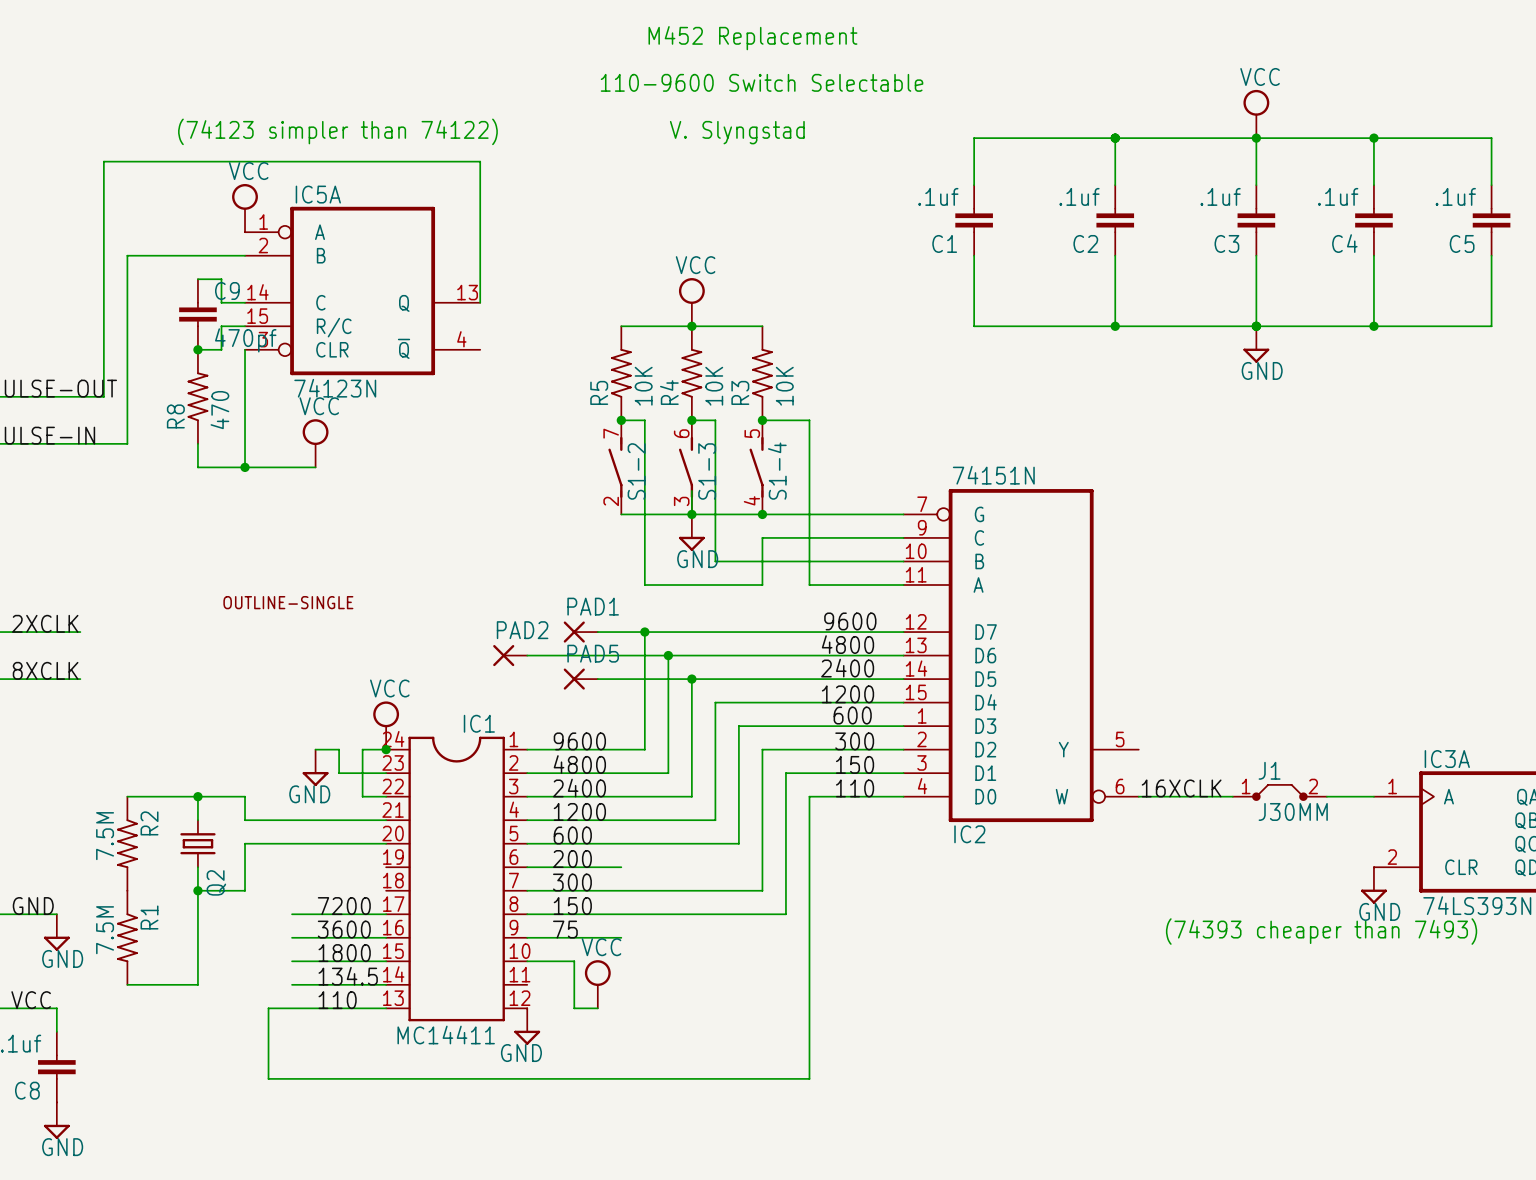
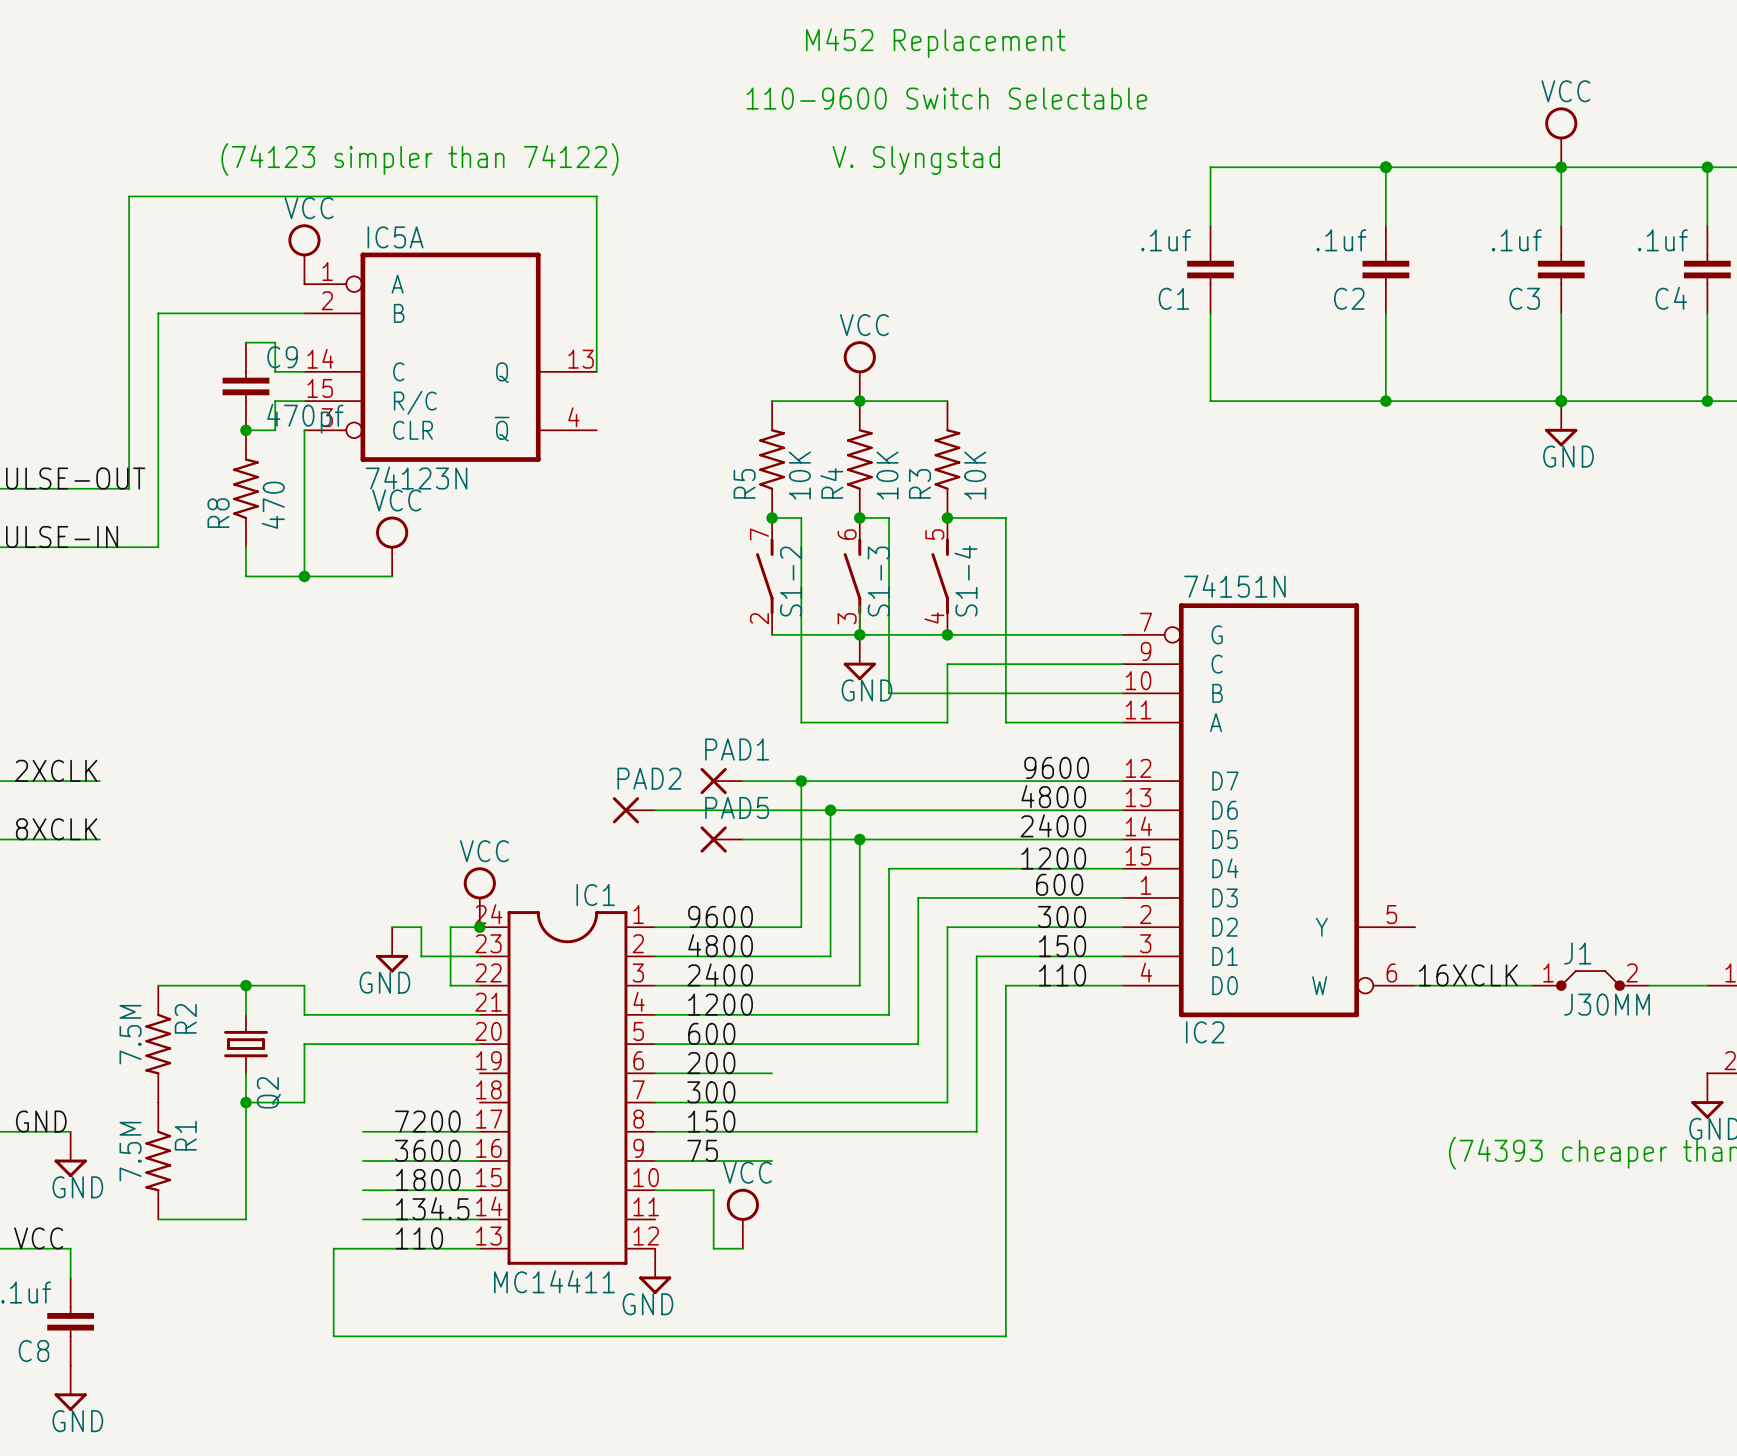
part: OUTLINE-SINGLE (288, 602) -> none

